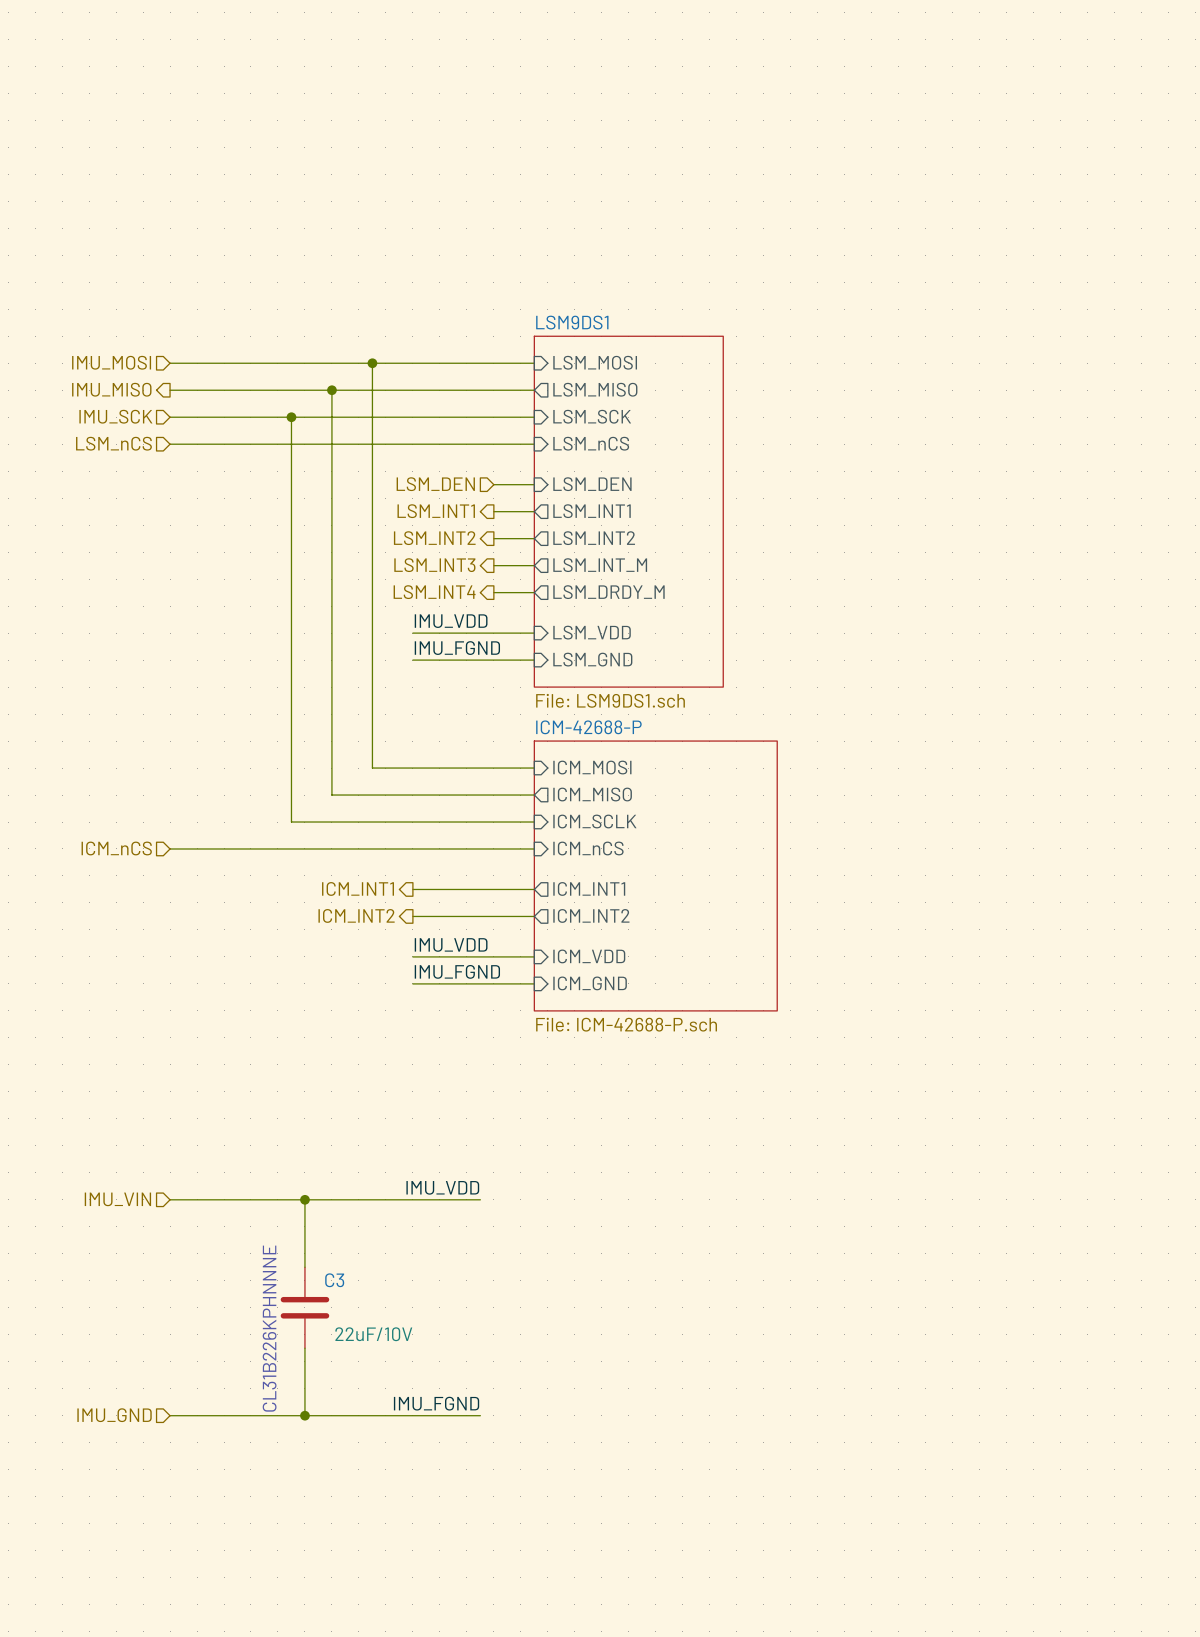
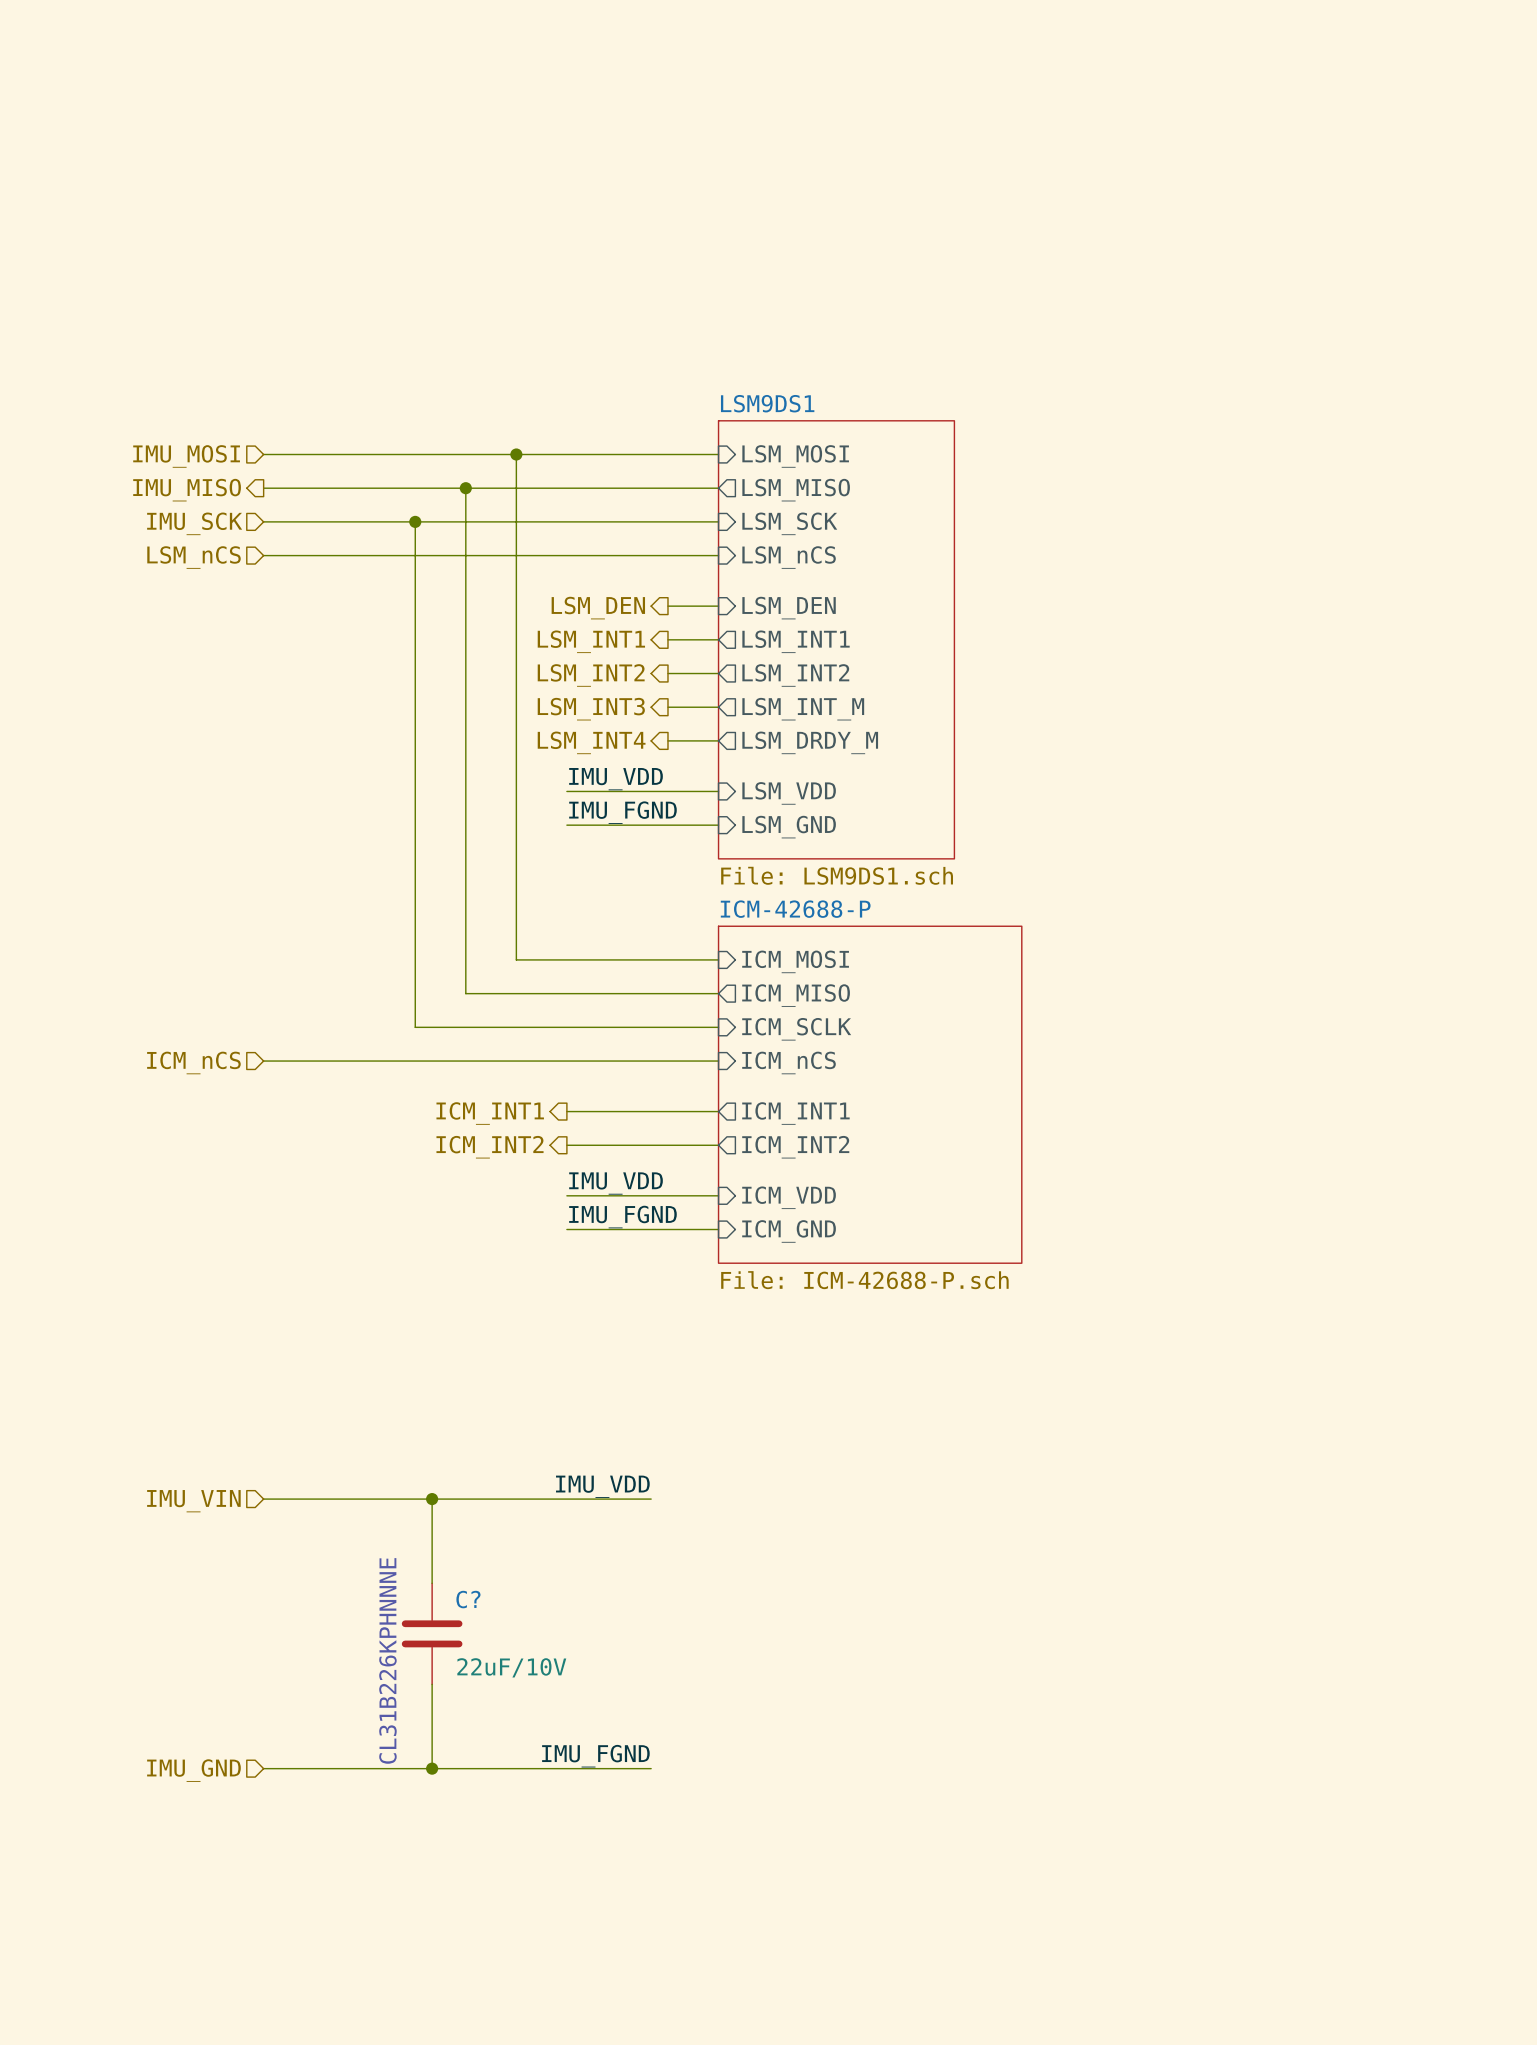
hierarchical label shape: input (435, 484) -> output (598, 608)
C3 name: C3 (334, 1280) -> C? (468, 1599)

